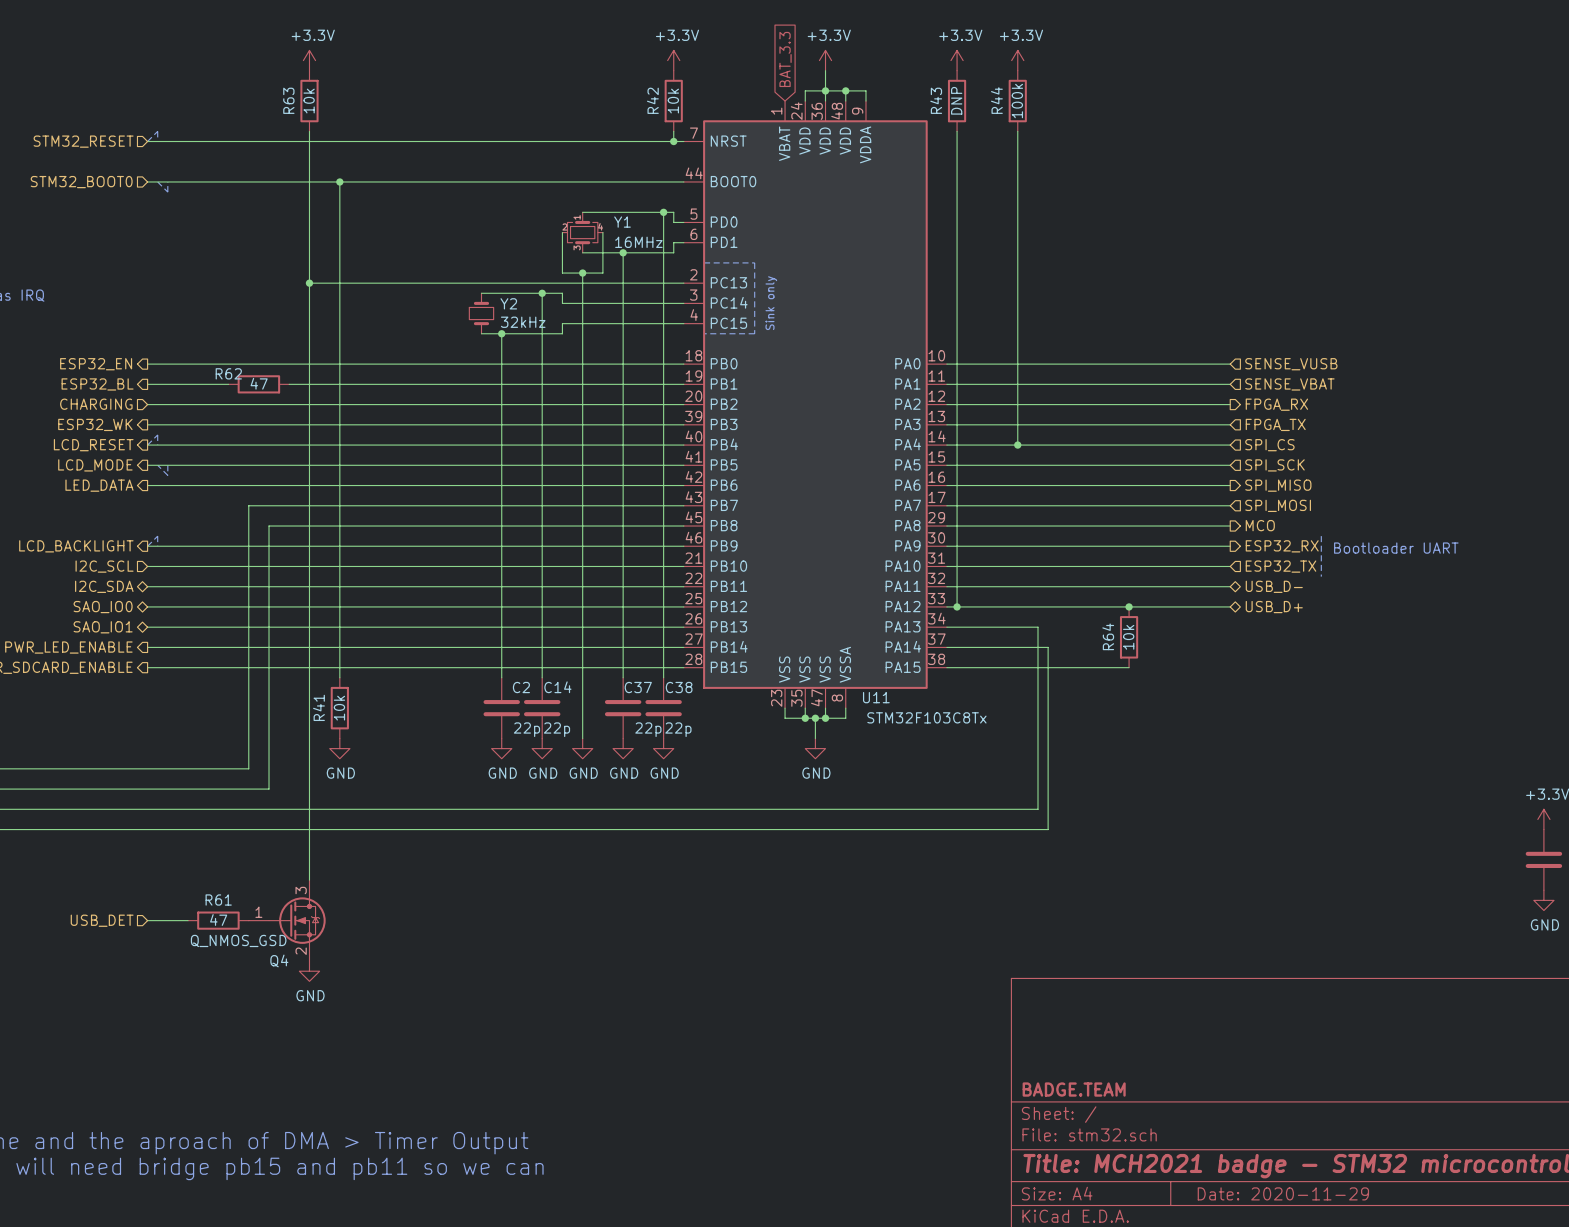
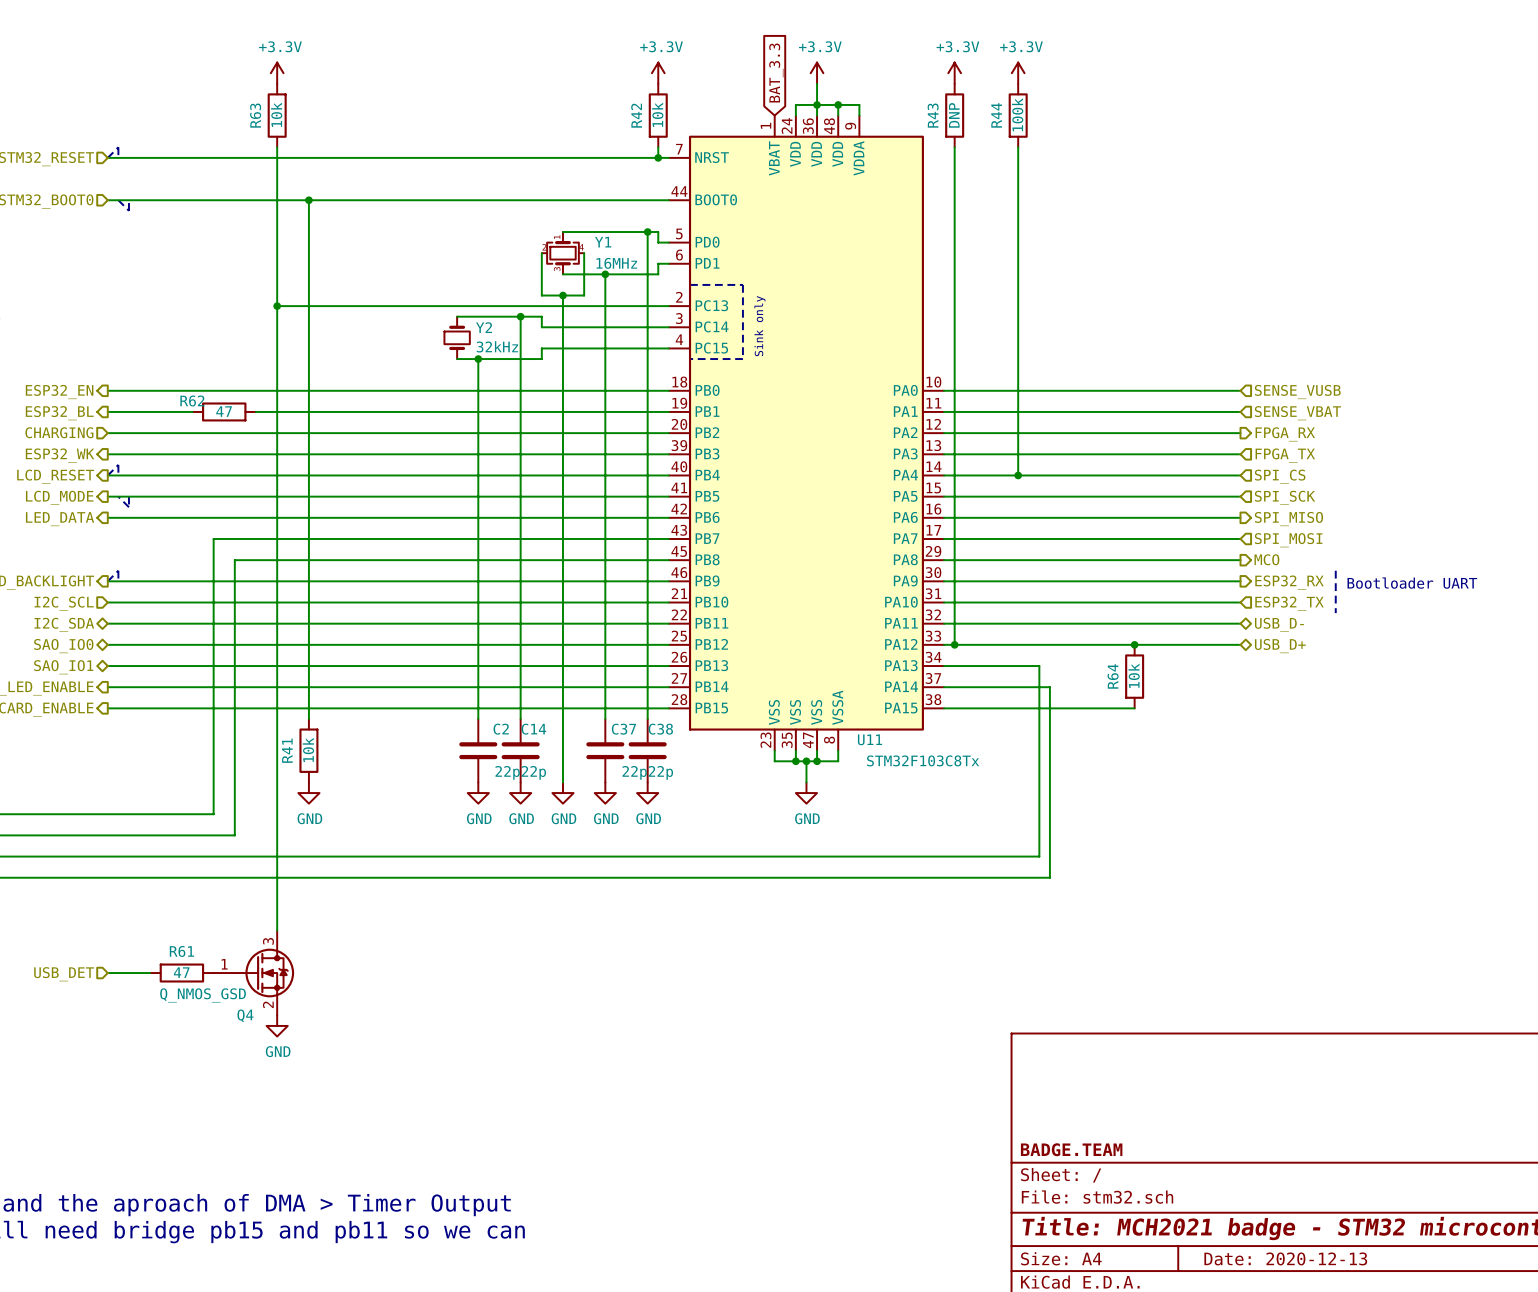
title block: Date: 2020-11-29 (1283, 1193) -> Date: 2020-12-13 (1285, 1258)

